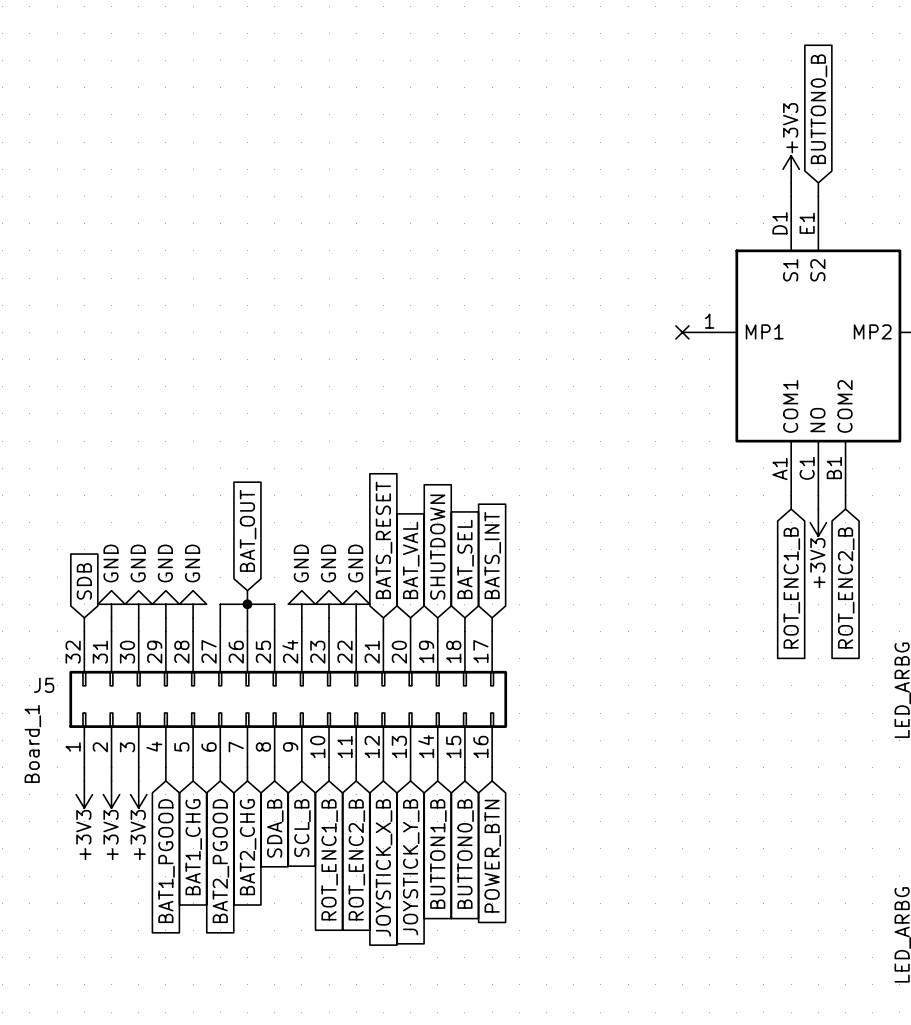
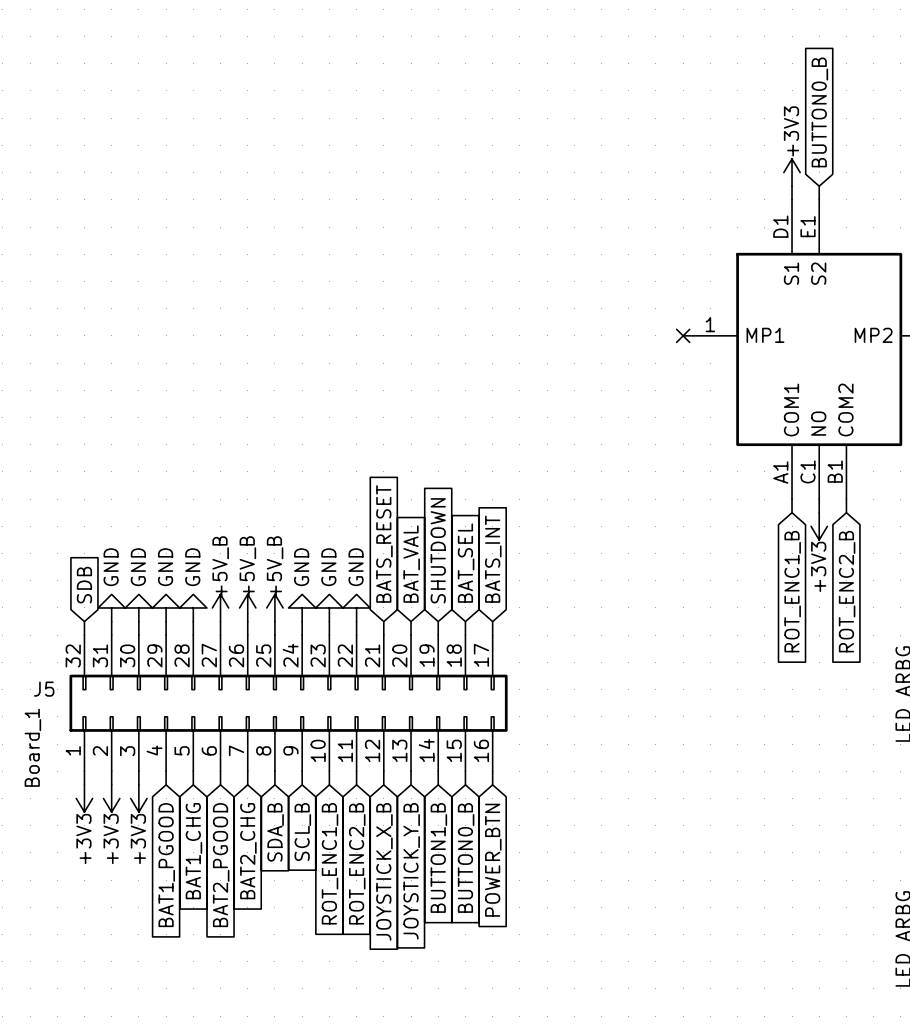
global label: BAT_OUT (248, 530) -> none
power symbol: none -> +5V_B (220, 607)
junction: (247, 604) -> none
power symbol: none -> +5V_B (247, 607)
power symbol: none -> +5V_B (274, 607)
wire: (220, 617) (220, 604) (274, 604) (274, 617) -> none

